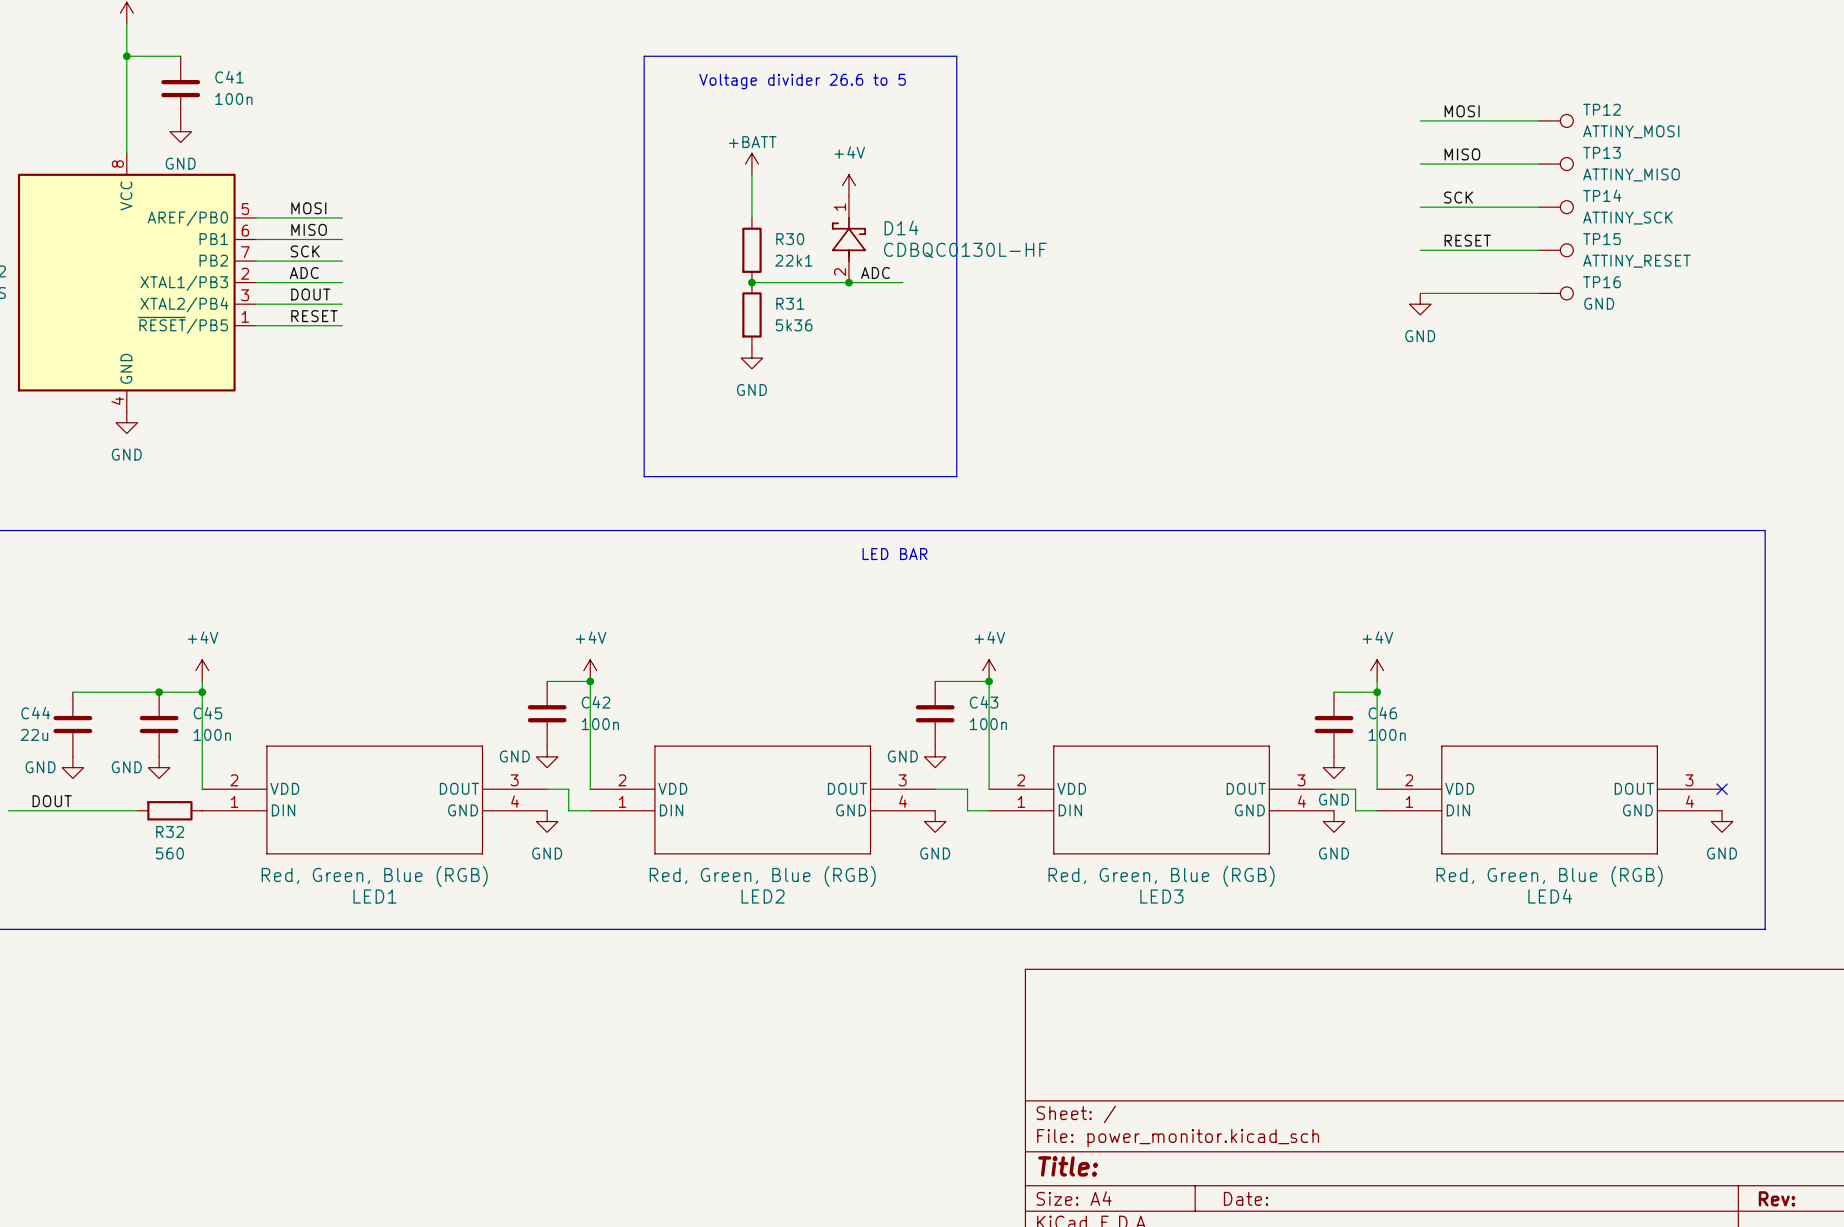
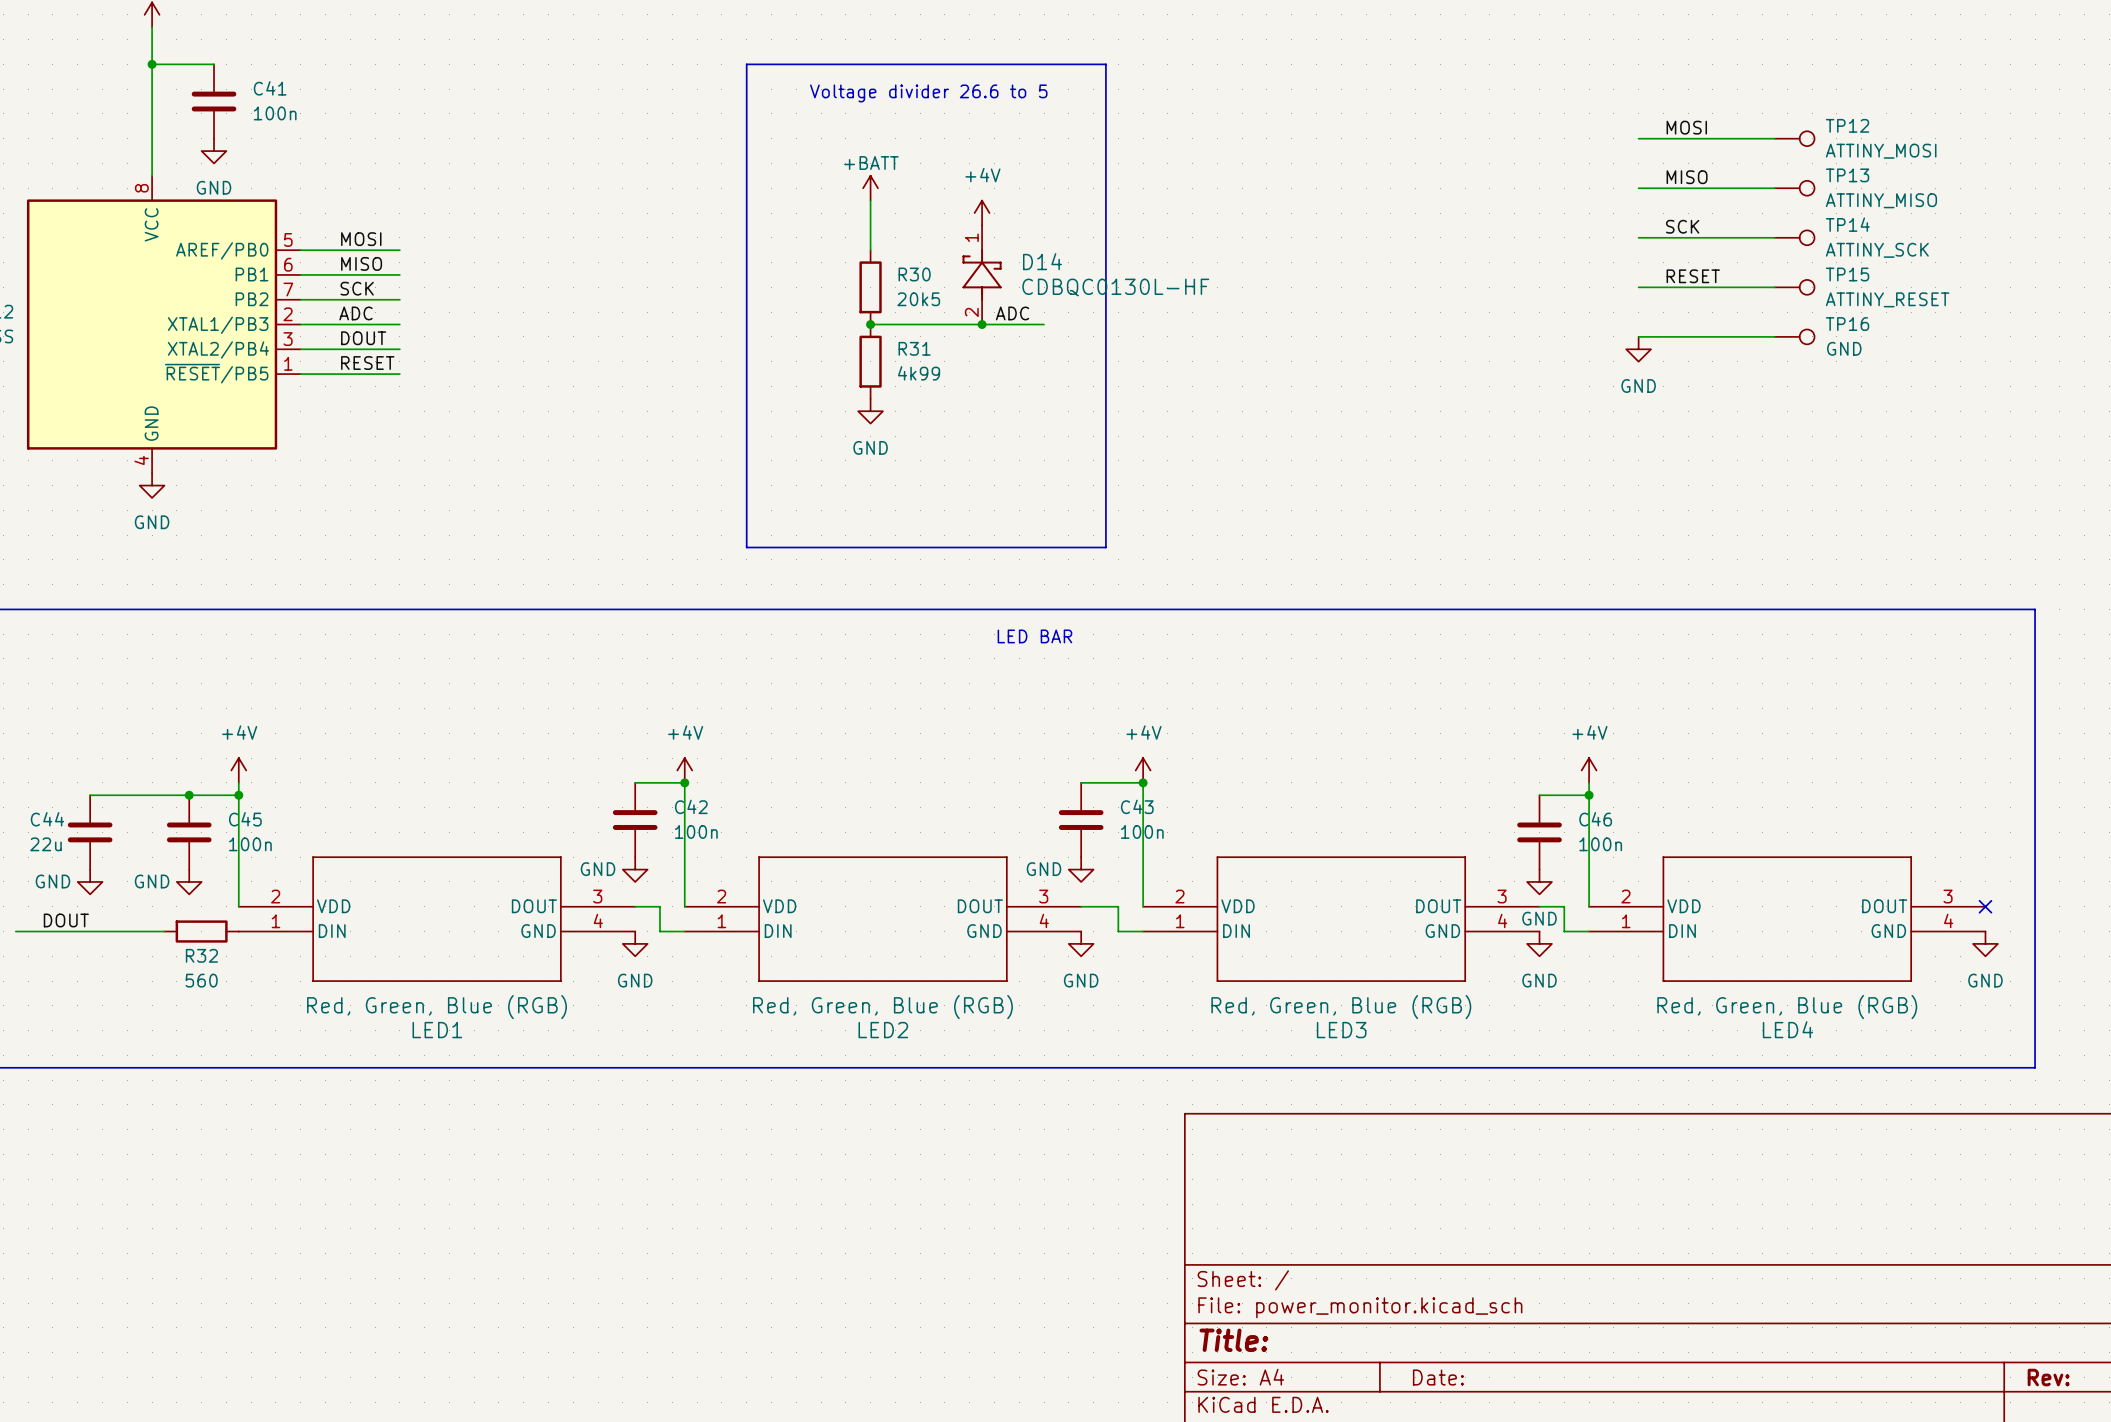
R30 value: 22k1 (793, 260) -> 20k5 (918, 299)
R31 value: 5k36 (794, 325) -> 4k99 (919, 373)

